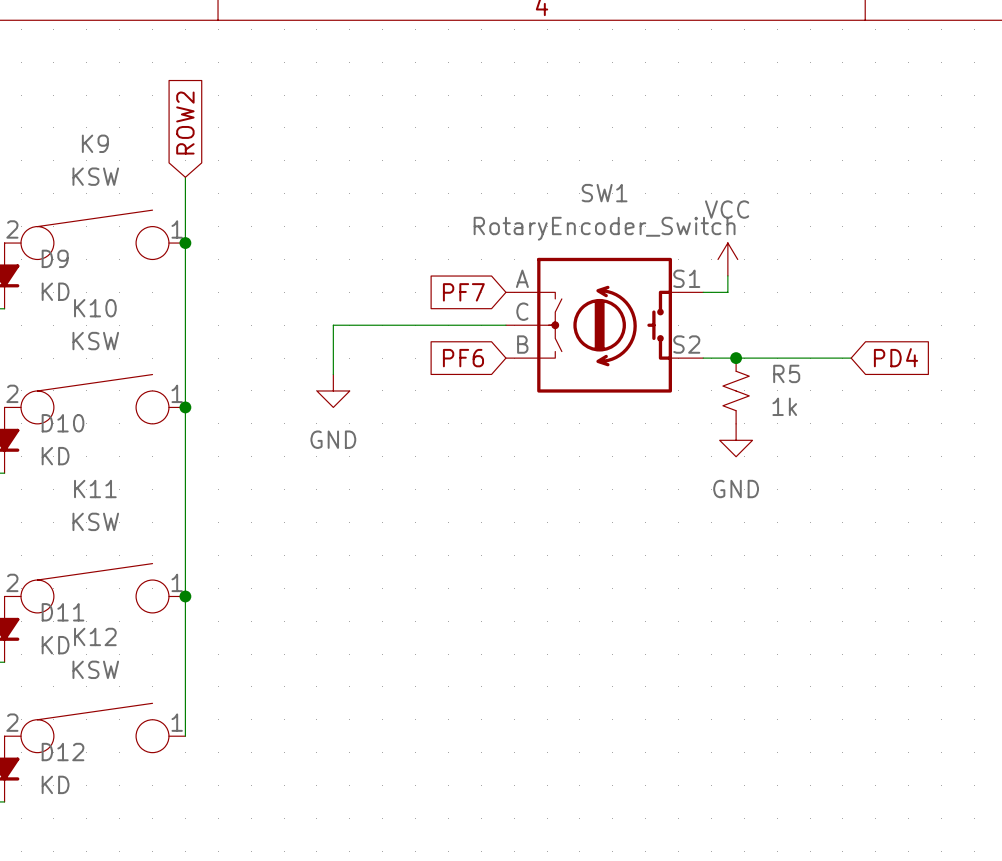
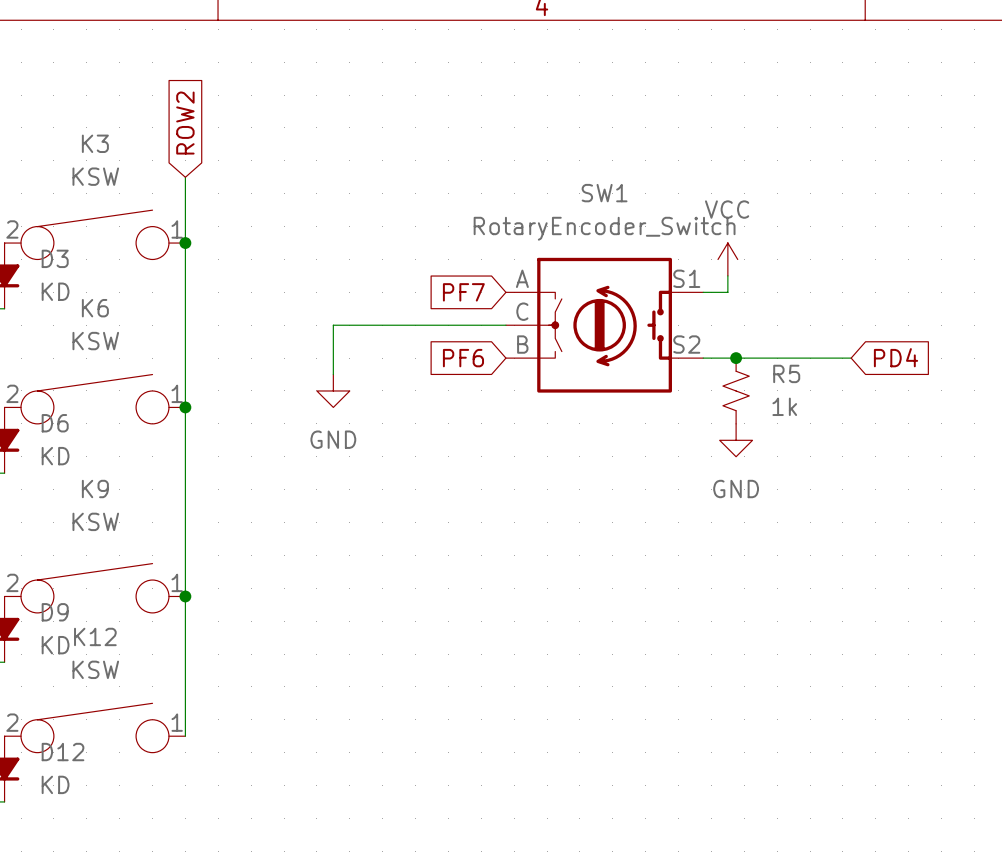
K9 name: K9 (95, 143) -> K3 (95, 143)
D9 name: D9 (55, 258) -> D3 (55, 258)
K10 name: K10 (95, 308) -> K6 (95, 308)
D10 name: D10 (63, 423) -> D6 (55, 423)
K11 name: K11 (95, 489) -> K9 (95, 489)
D11 name: D11 (63, 612) -> D9 (55, 612)

